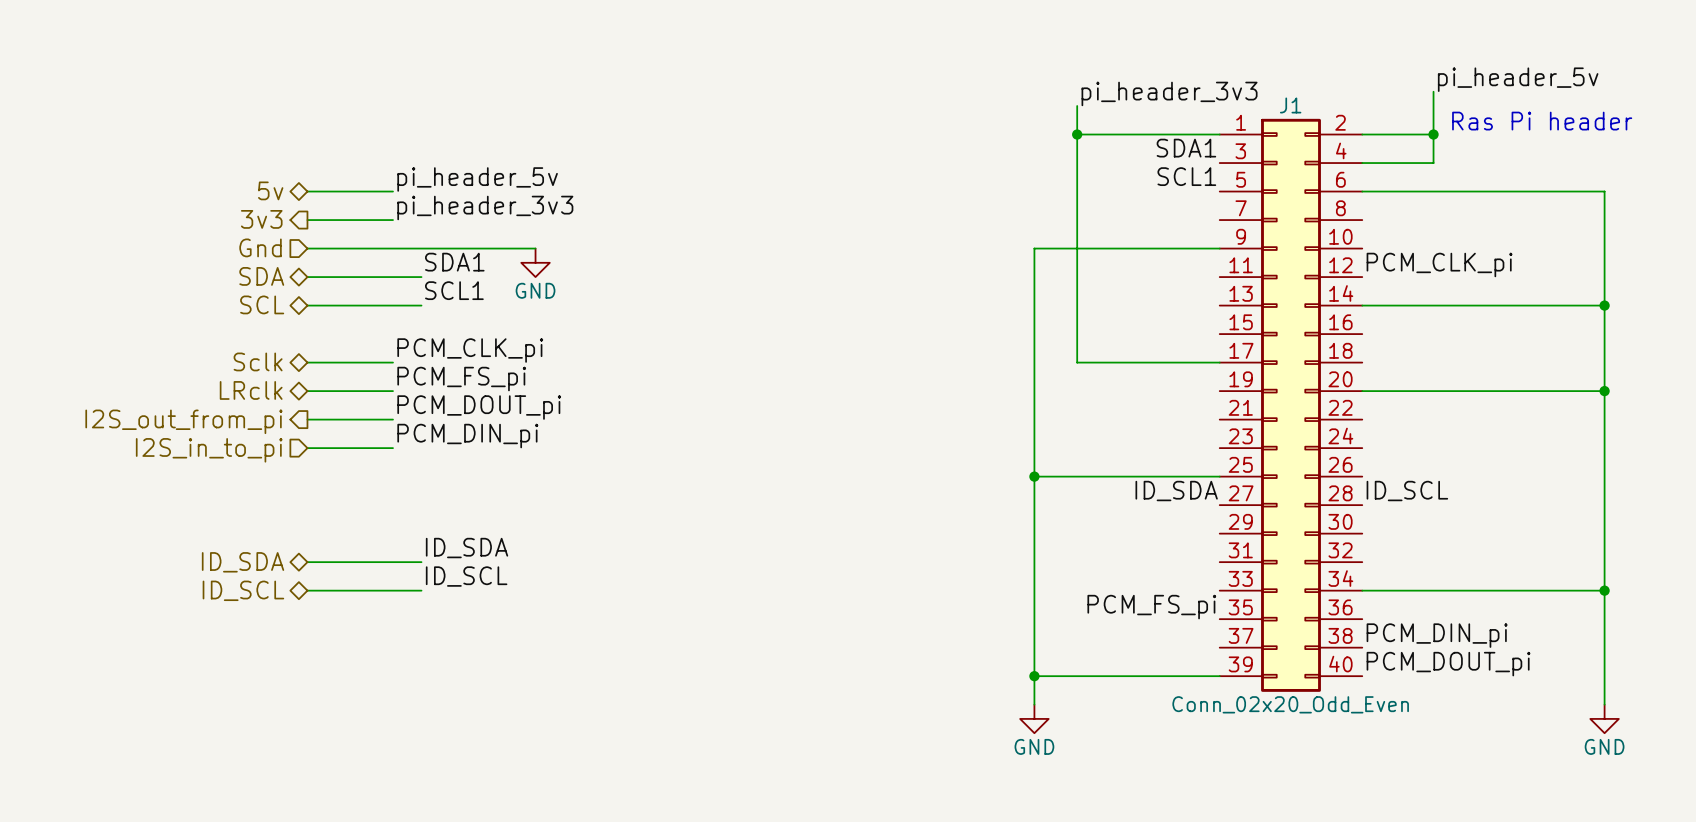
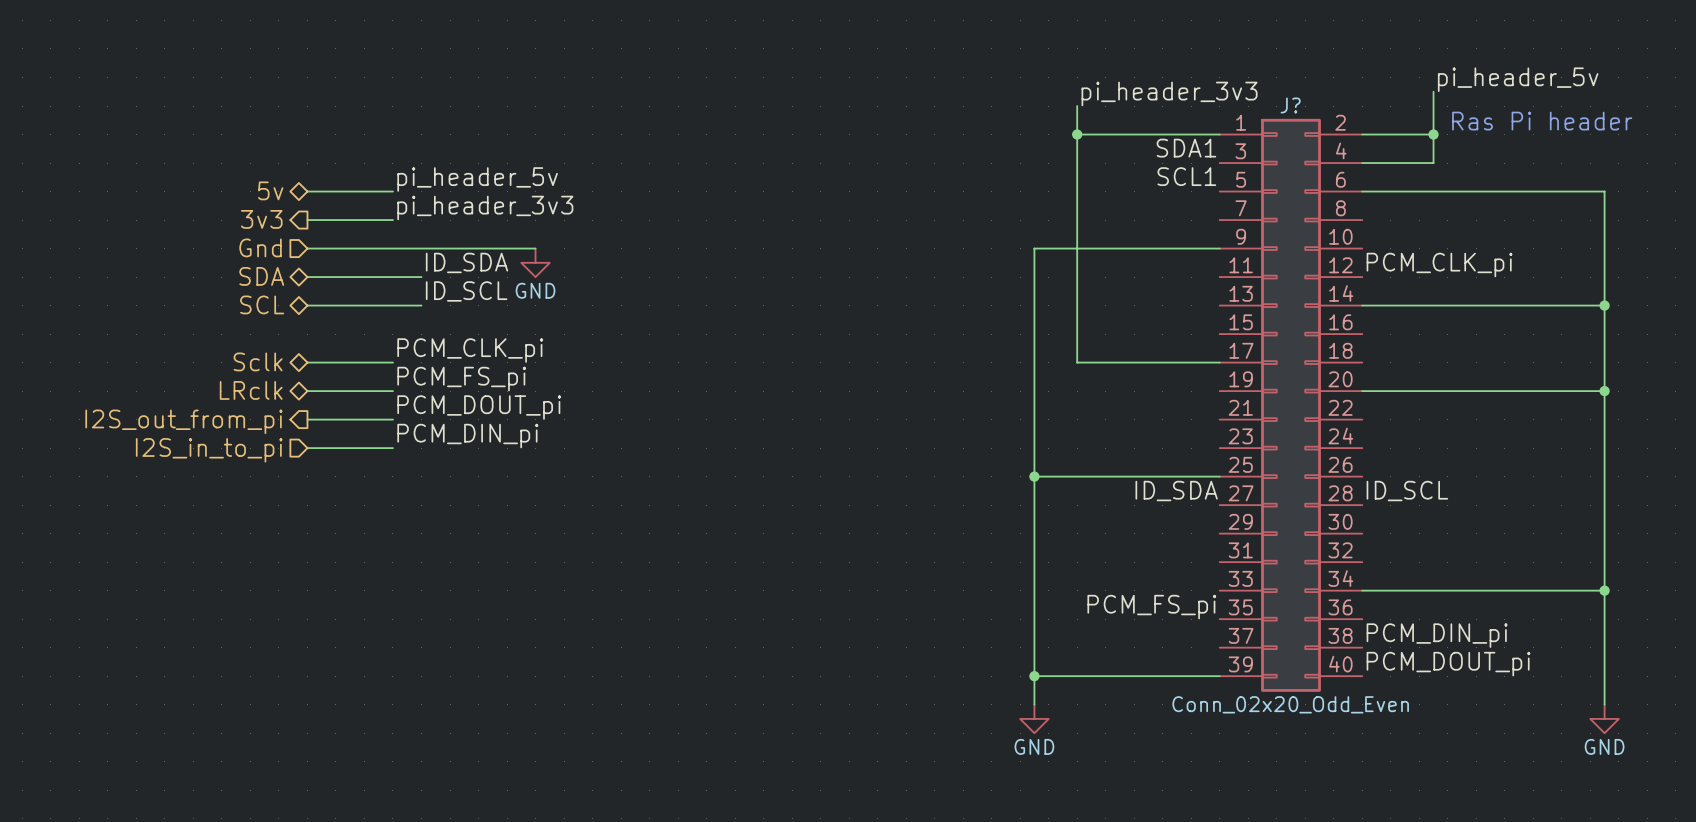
J1 name: J1 (1290, 105) -> J? (1290, 105)
label: SDA1 (454, 262) -> ID_SDA (467, 262)
label: SCL1 (454, 290) -> ID_SCL (466, 291)
label: ID_SDA (467, 548) -> none
hierarchical label: ID_SDA (243, 562) -> none
wire: (307, 562) (421, 562) -> none
label: ID_SCL (466, 576) -> none
hierarchical label: ID_SCL (243, 590) -> none
wire: (307, 590) (421, 590) -> none

